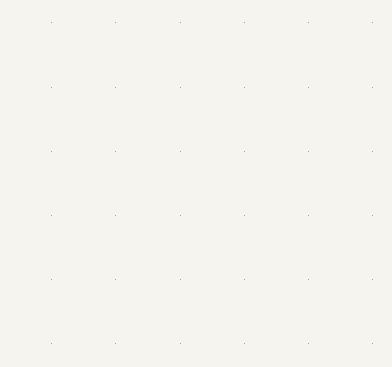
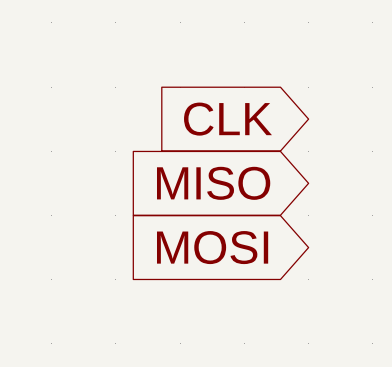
global label: none -> CLK (227, 119)
global label: none -> MISO (213, 183)
global label: none -> MOSI (212, 247)

